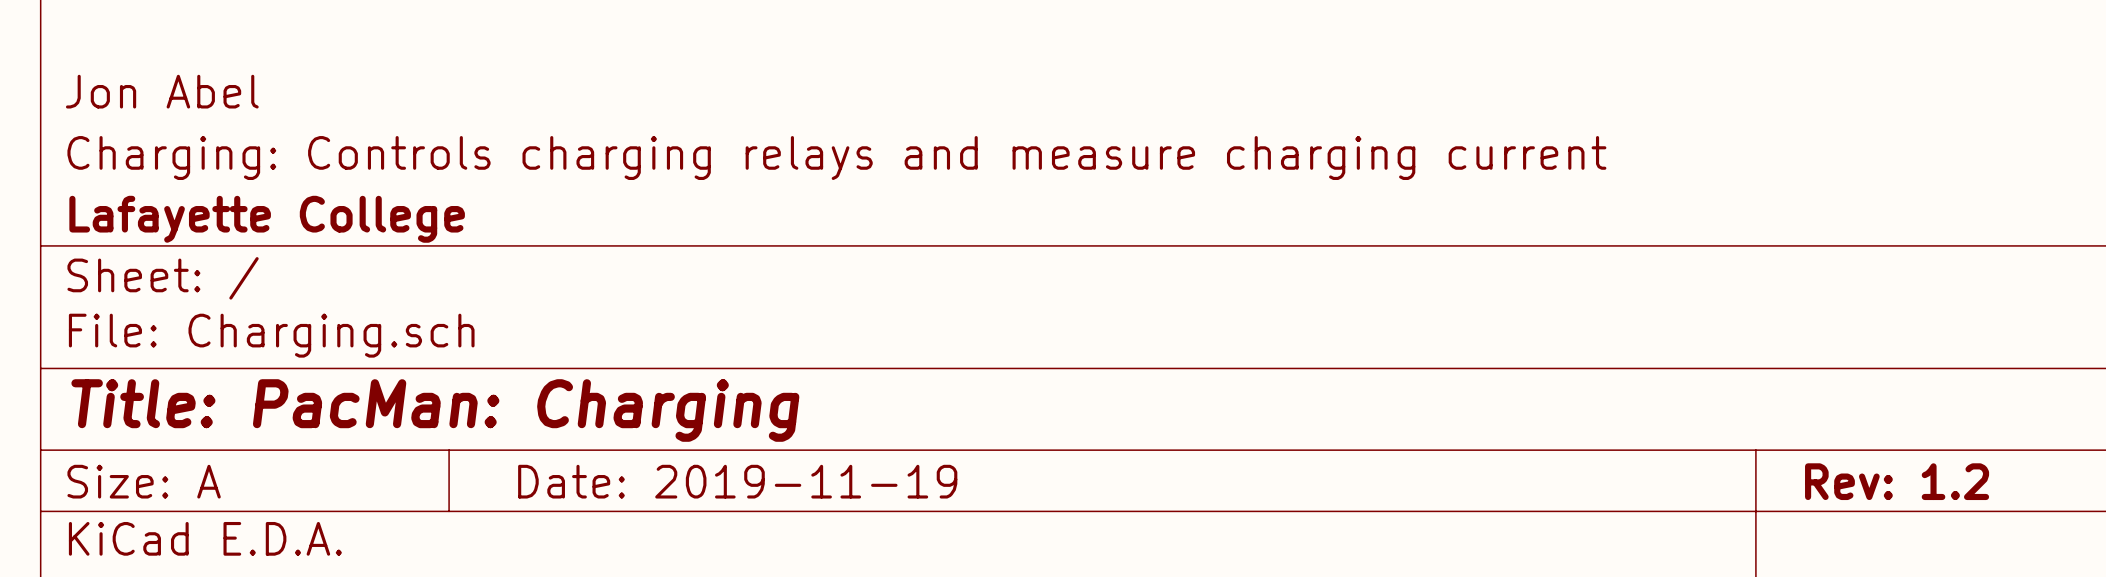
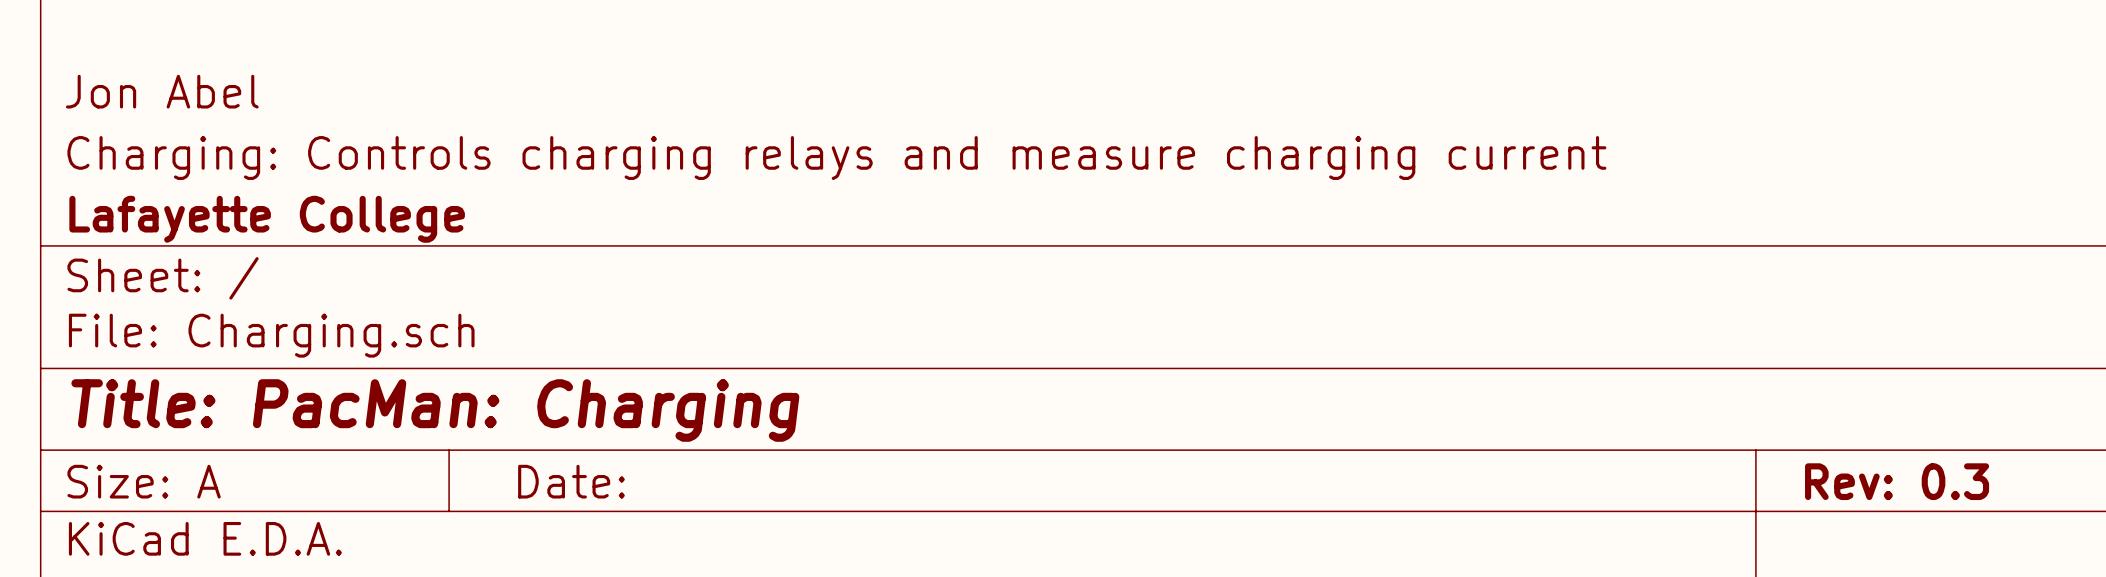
title block: Date: 2019-11-19 (737, 481) -> Date: (571, 481)
title block: Rev: 1.2 (1897, 481) -> Rev: 0.3 (1897, 481)

